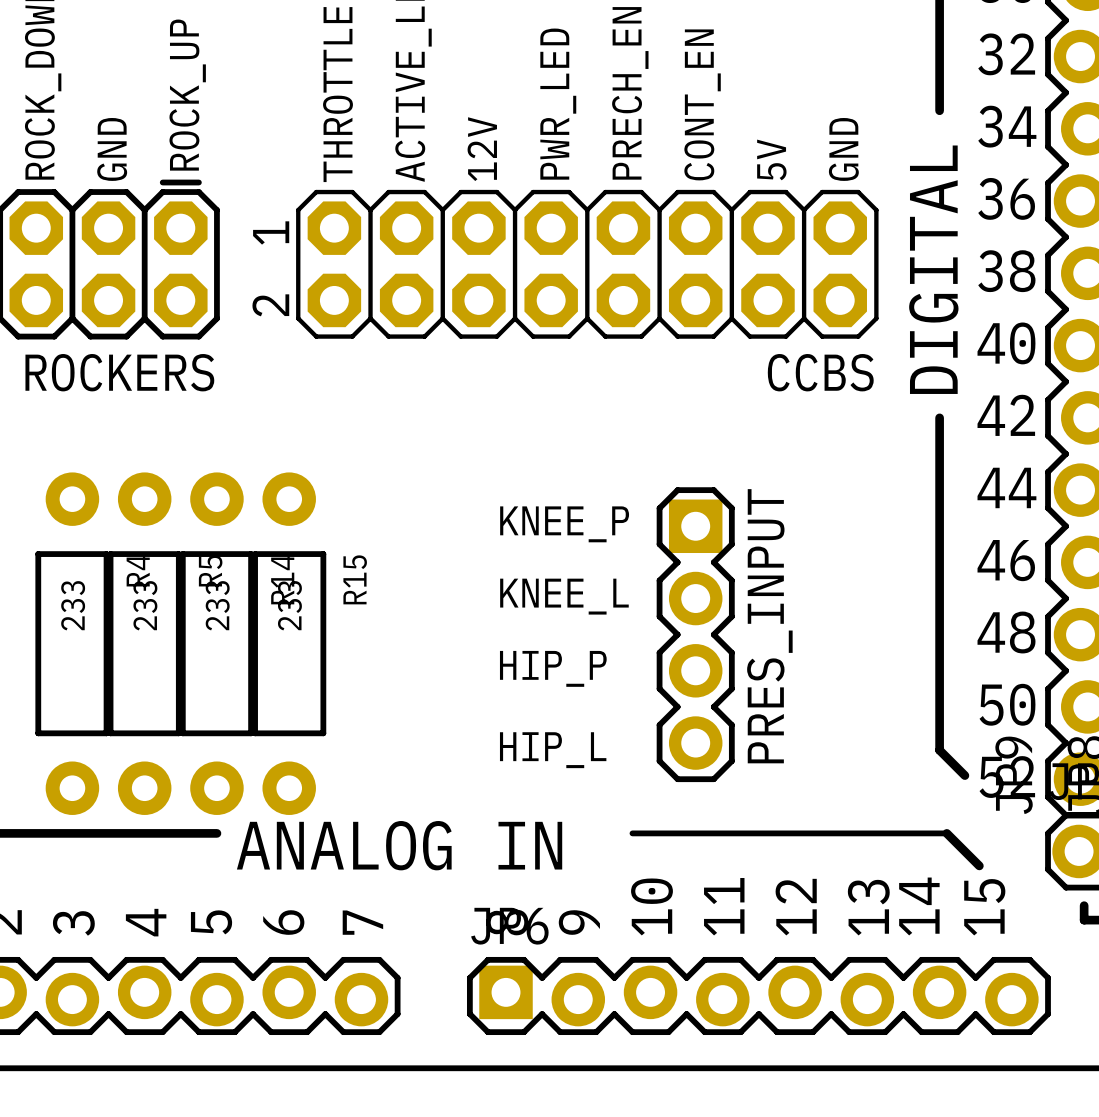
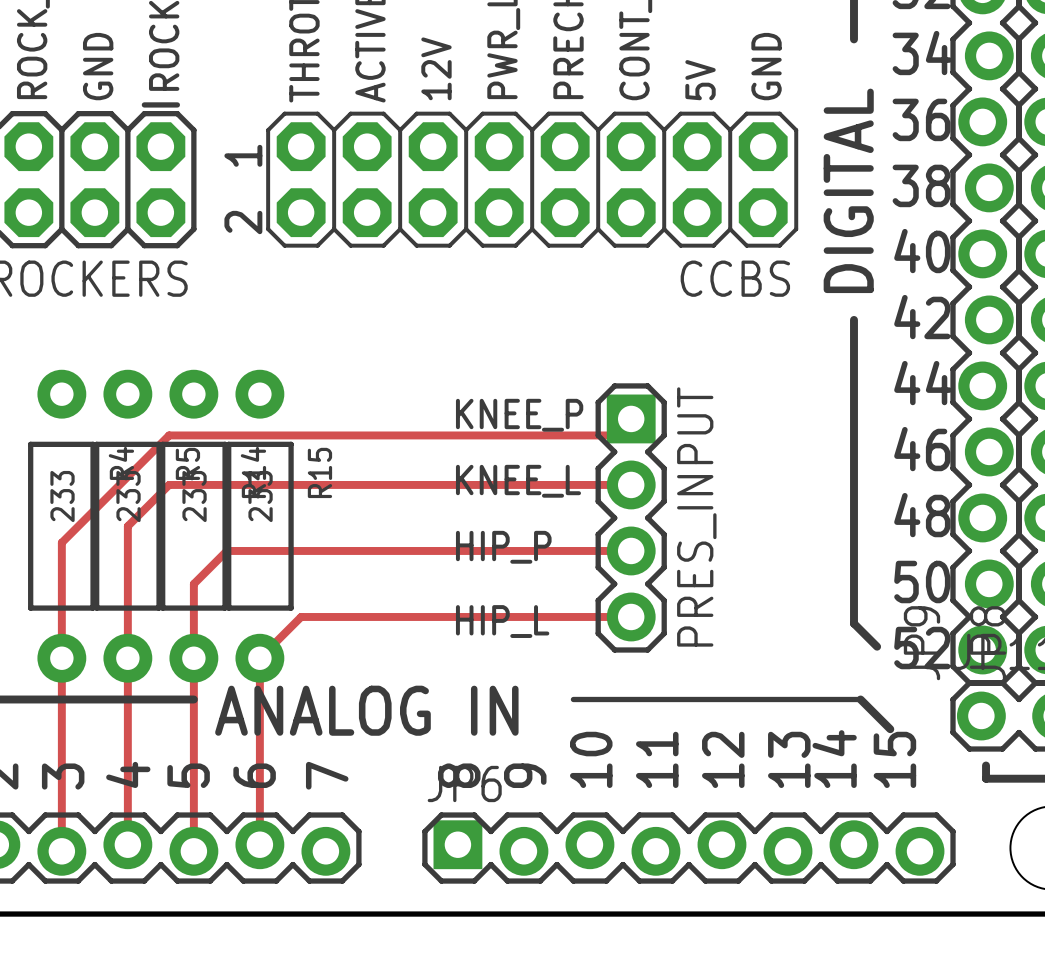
track: none -> (631, 418) (614, 435) (169, 435) (61, 542) (61, 851)
track: none -> (631, 484) (169, 484) (127, 526) (127, 844)
track: none -> (631, 550) (226, 550) (193, 583) (193, 851)
track: none -> (631, 616) (301, 616) (259, 658) (259, 844)

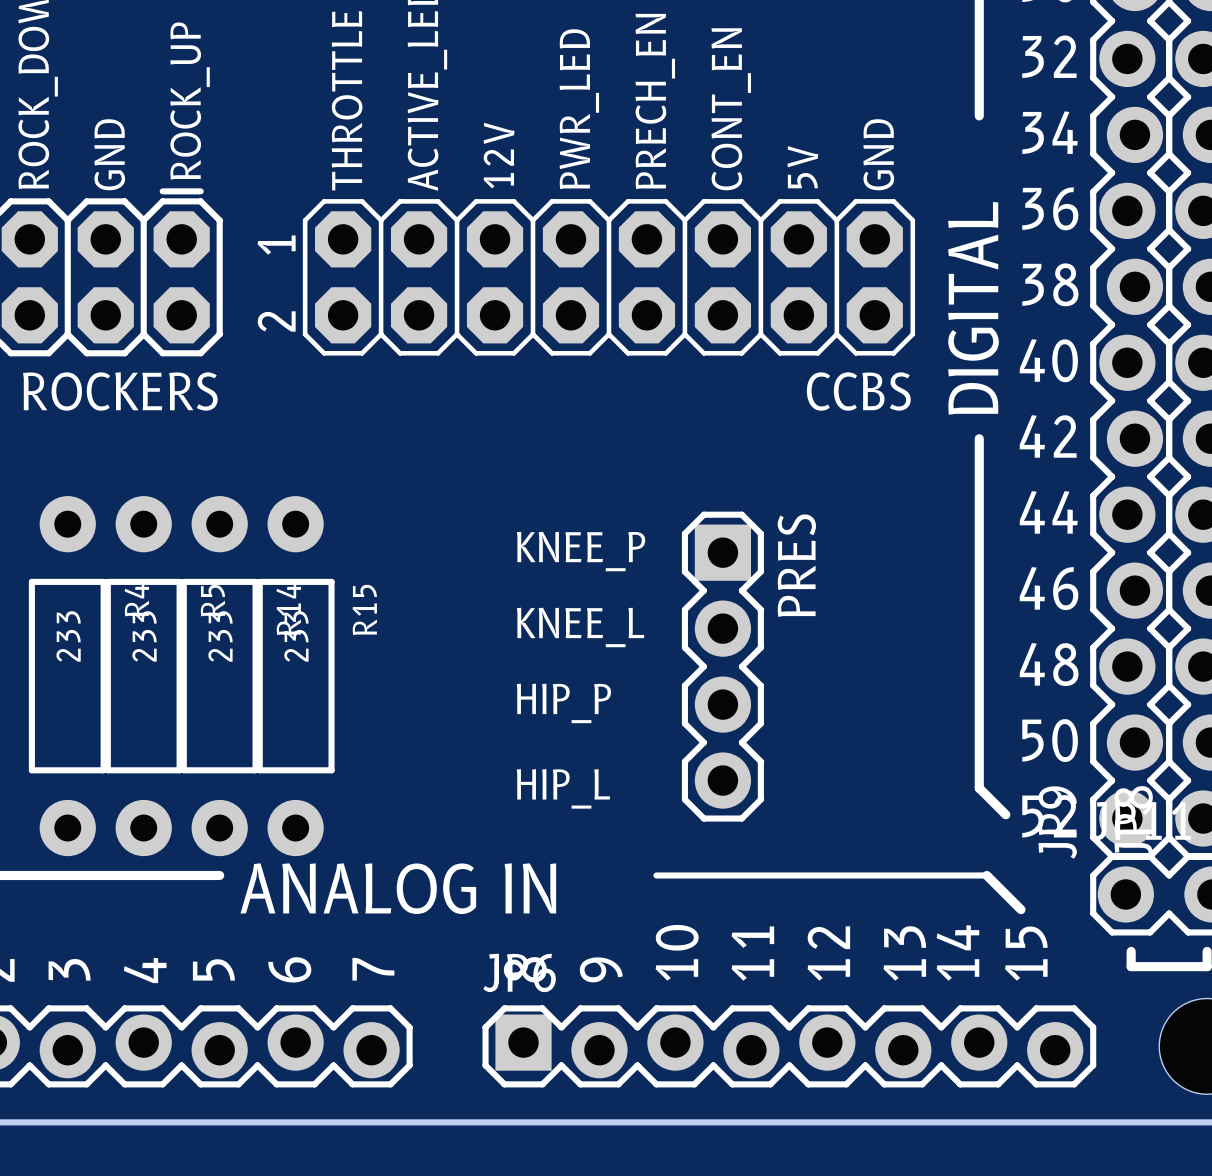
track: (631, 418) (614, 435) (169, 435) (61, 542) (61, 851) -> none
track: (631, 484) (169, 484) (127, 526) (127, 844) -> none
PRES_INPUT name: PRES_INPUT (696, 516) -> PRES (796, 565)
track: (631, 550) (226, 550) (193, 583) (193, 851) -> none
track: (631, 616) (301, 616) (259, 658) (259, 844) -> none

